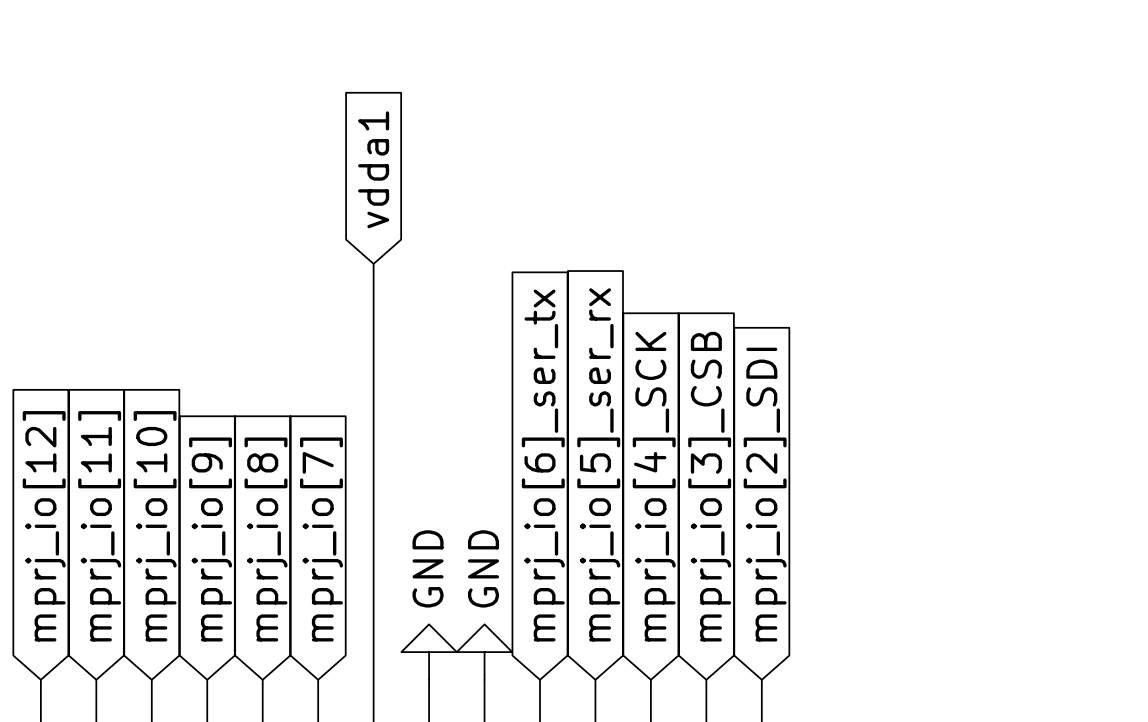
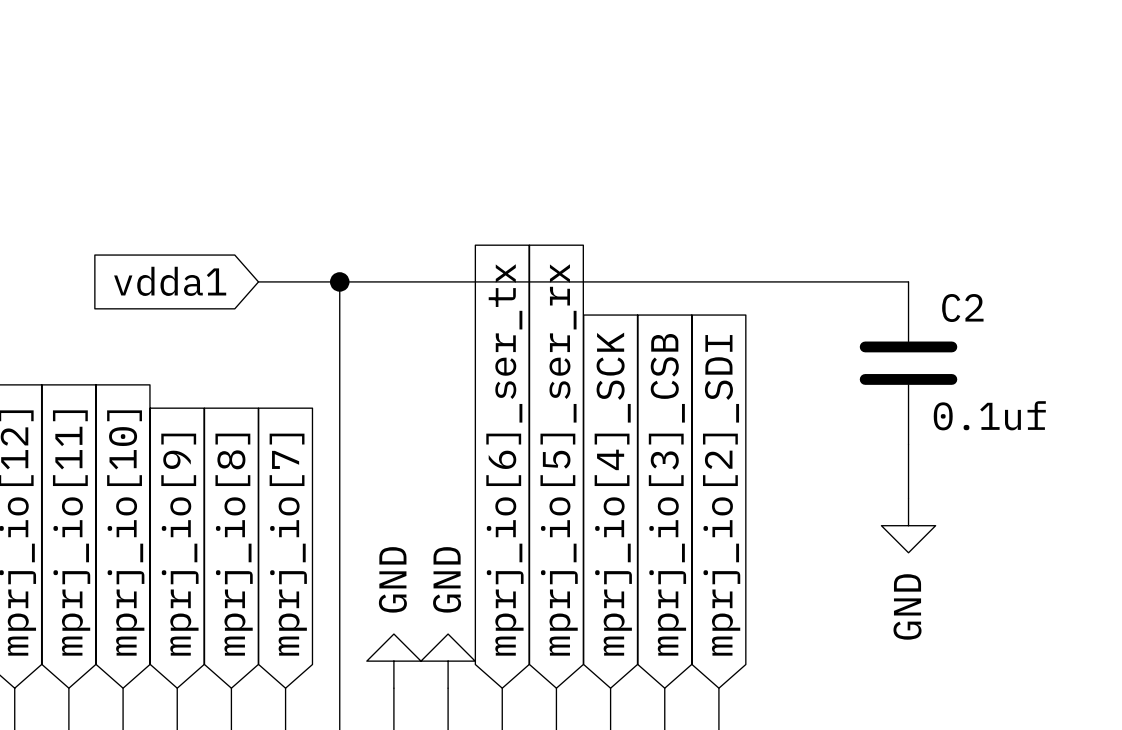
global label rotation: 0° (373, 169) -> 90° counterclockwise (170, 281)
global label position: vdda1 (373, 169) -> vdda1 (170, 281)
wire: none -> (258, 281) (908, 281)
junction: none -> (339, 281)
C2: none -> 0.1uf (908, 363)
wire: none -> (908, 444) (908, 498)
power symbol: none -> GND (908, 525)

